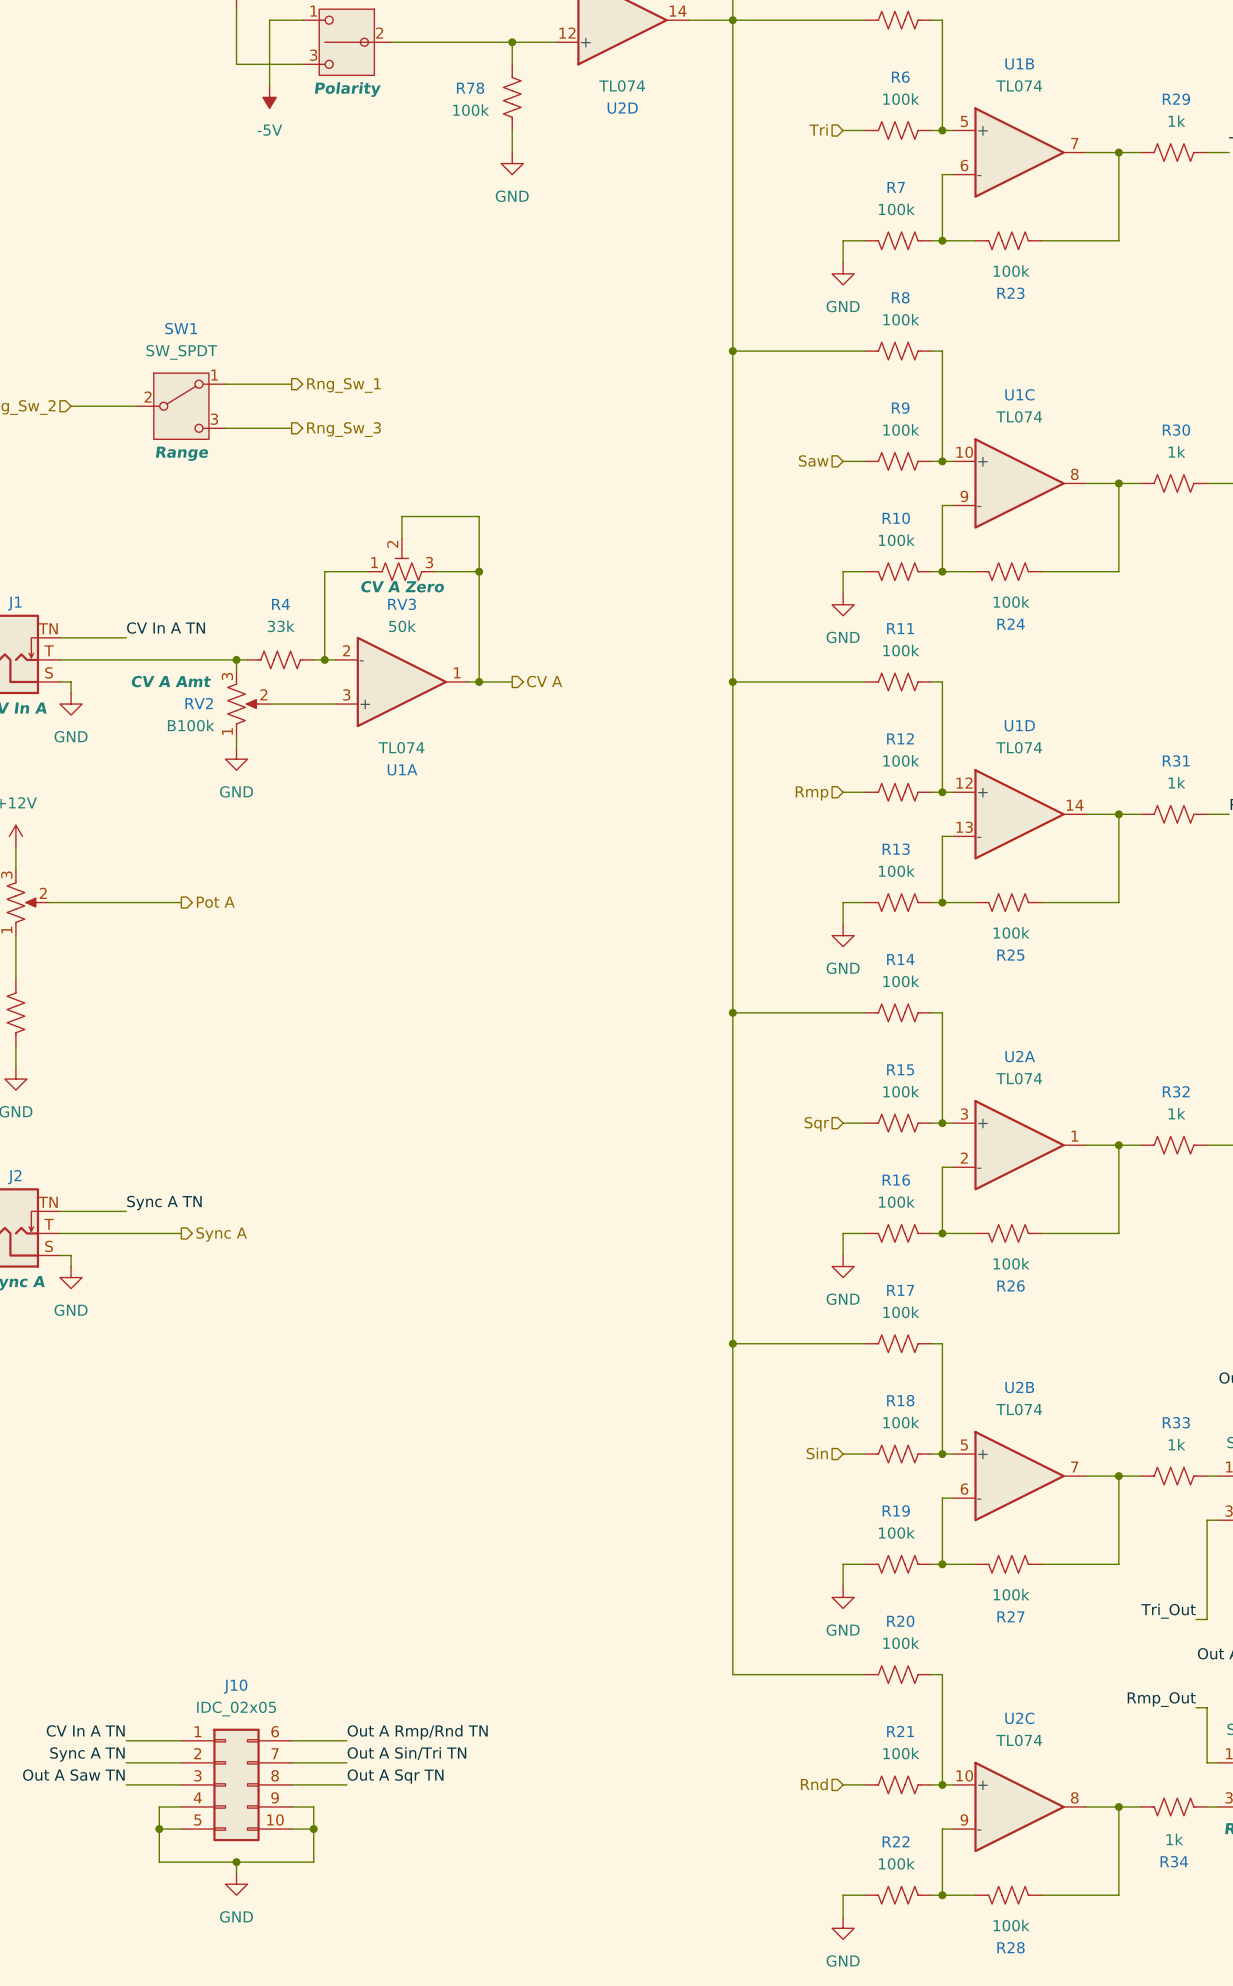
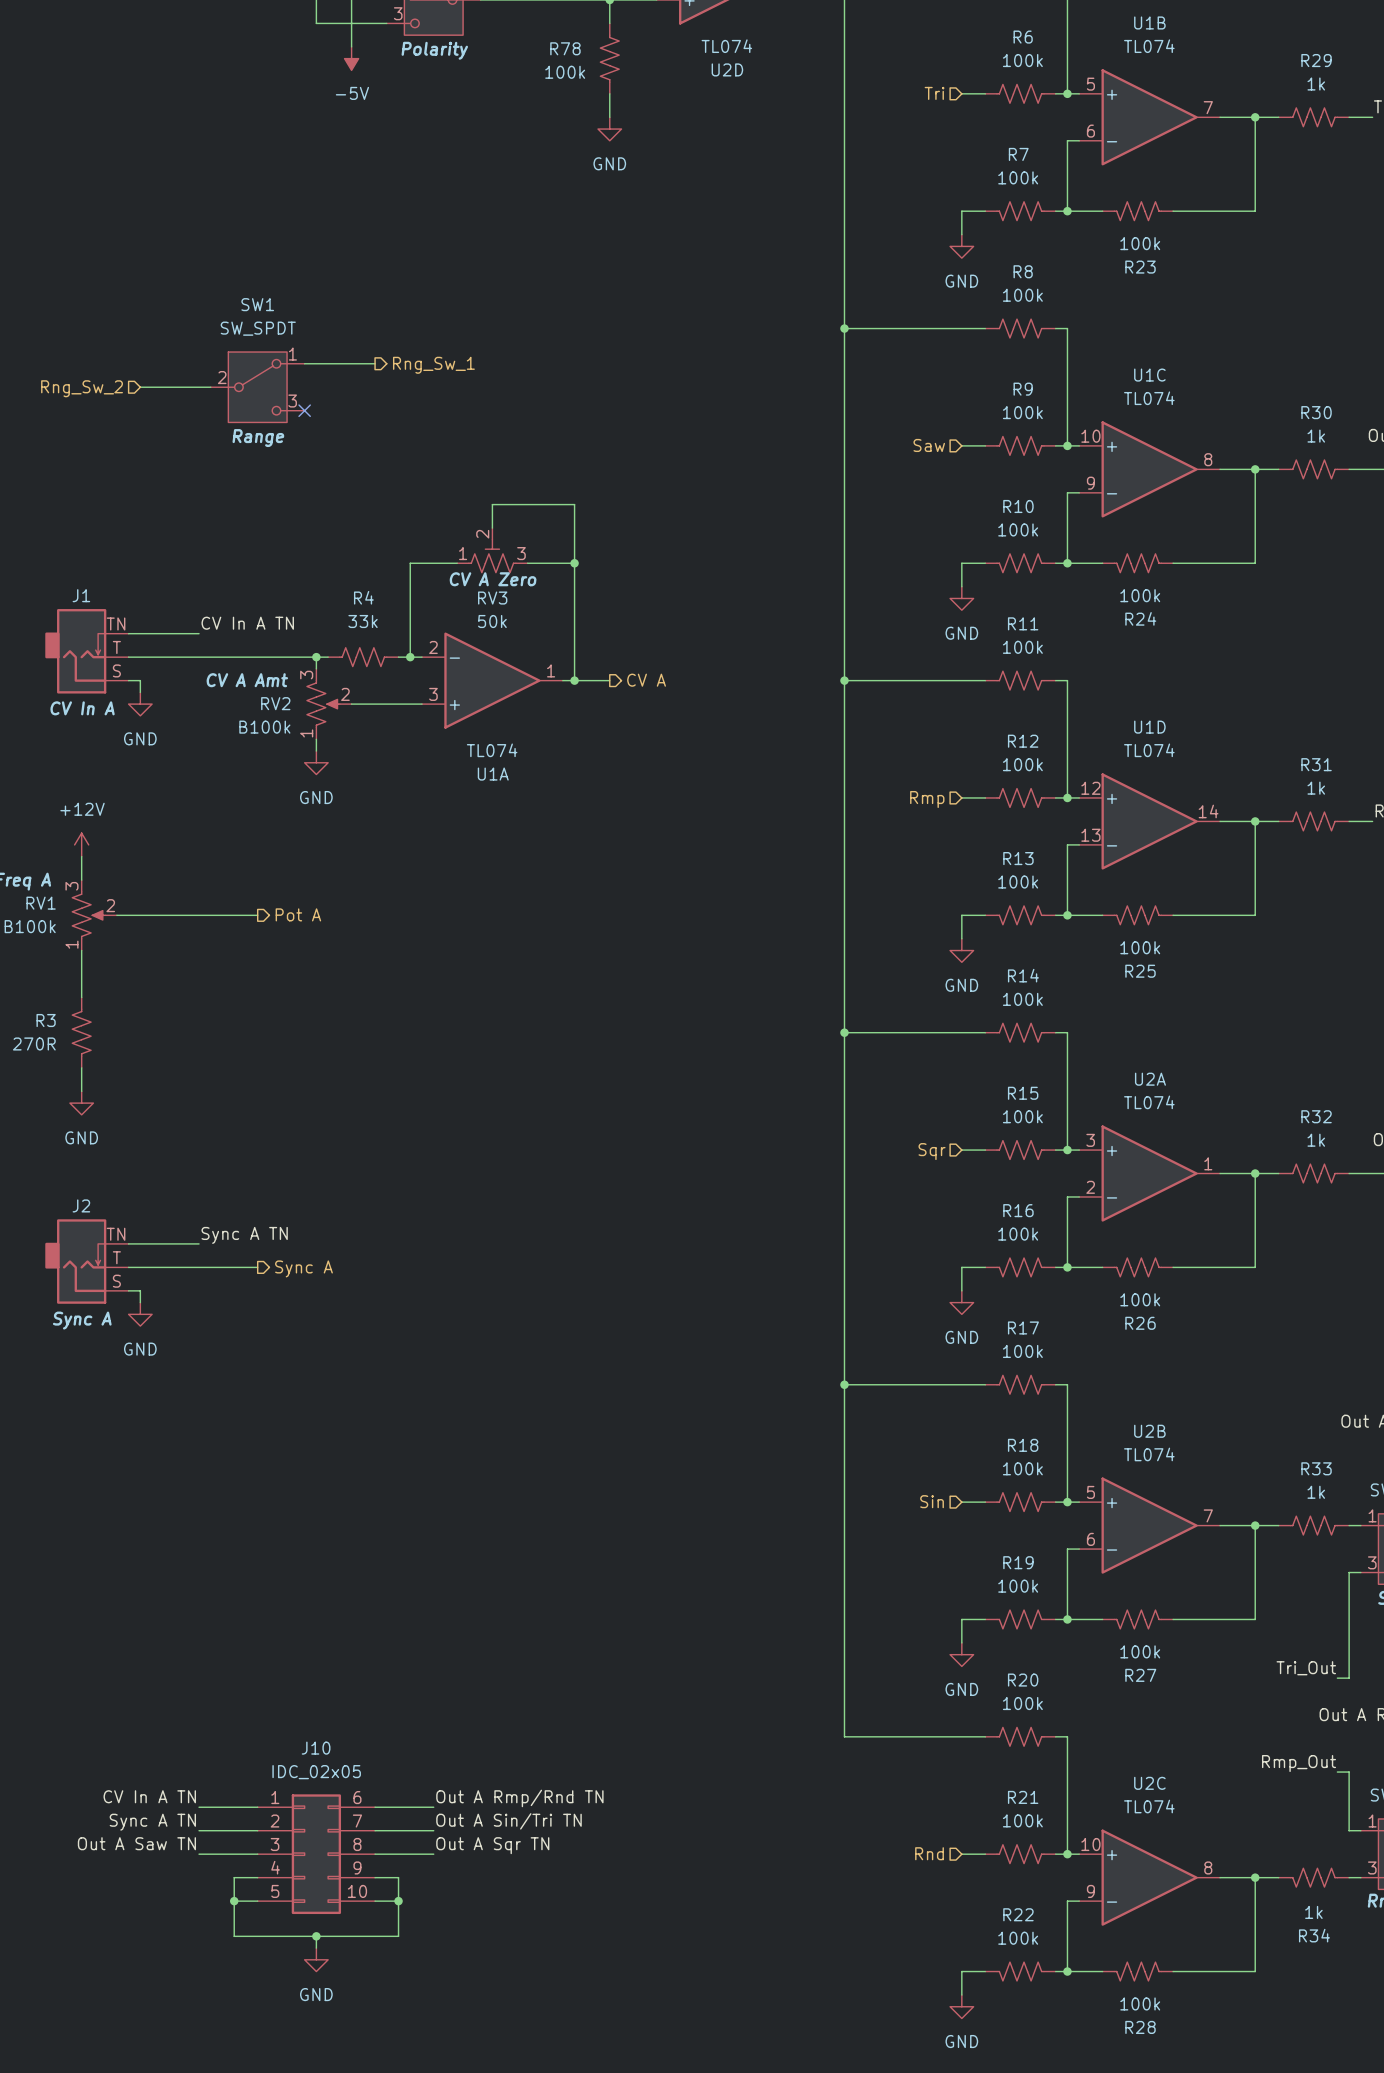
wire: (225, 428) (291, 428) -> none
no-connect mark: none -> (304, 410)
hierarchical label: Rng_Sw_3 (344, 429) -> none

